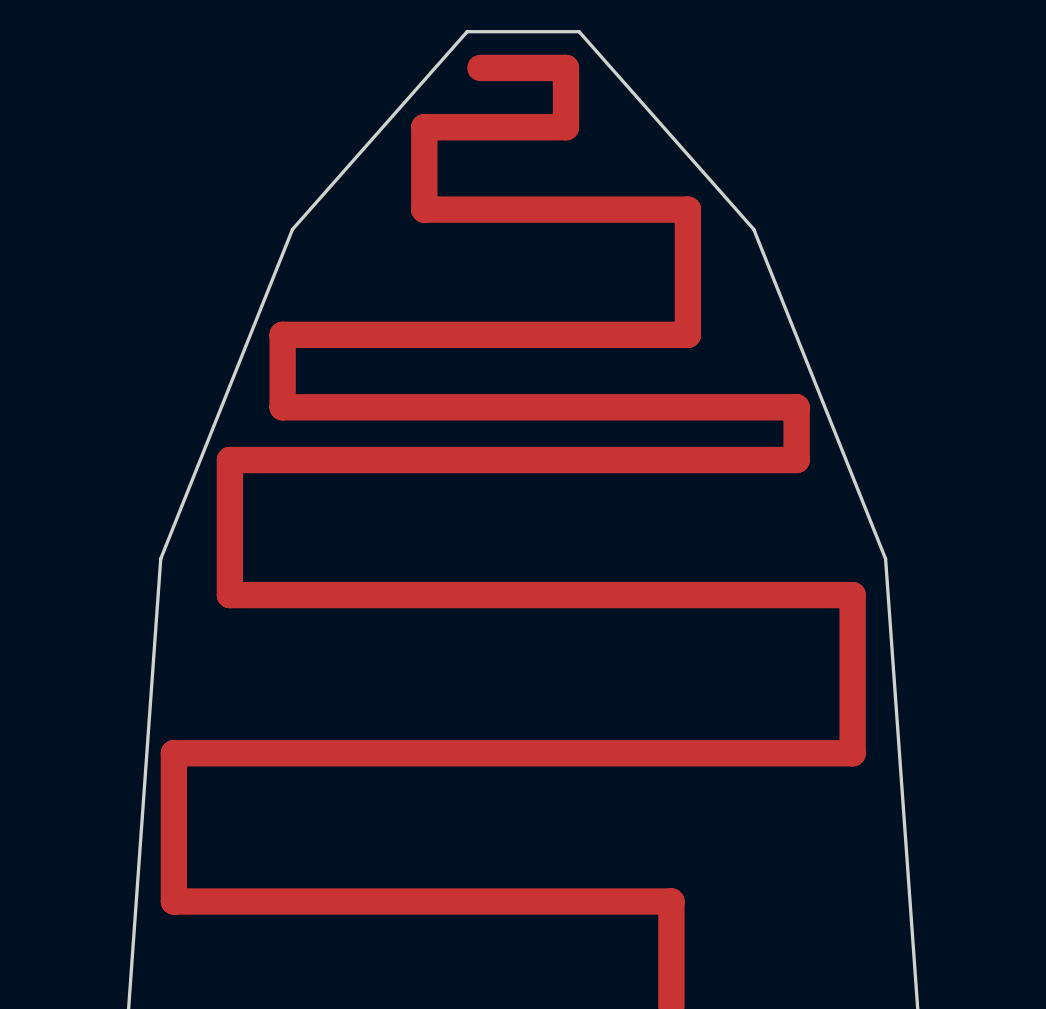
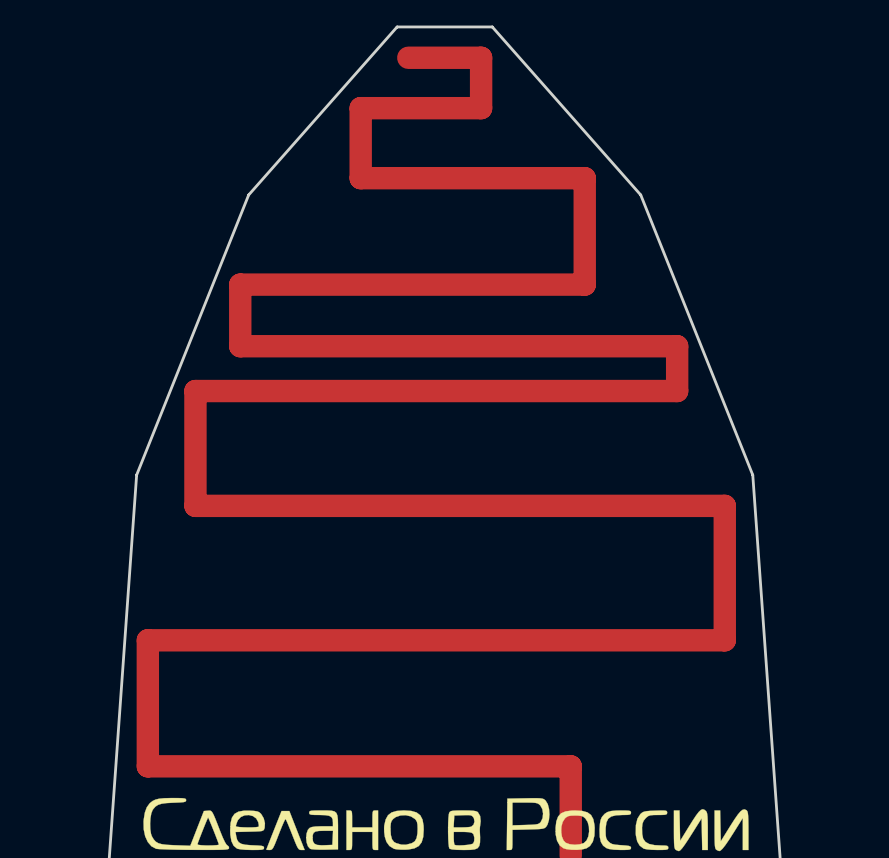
drawing: none -> [143, 797, 749, 852]

